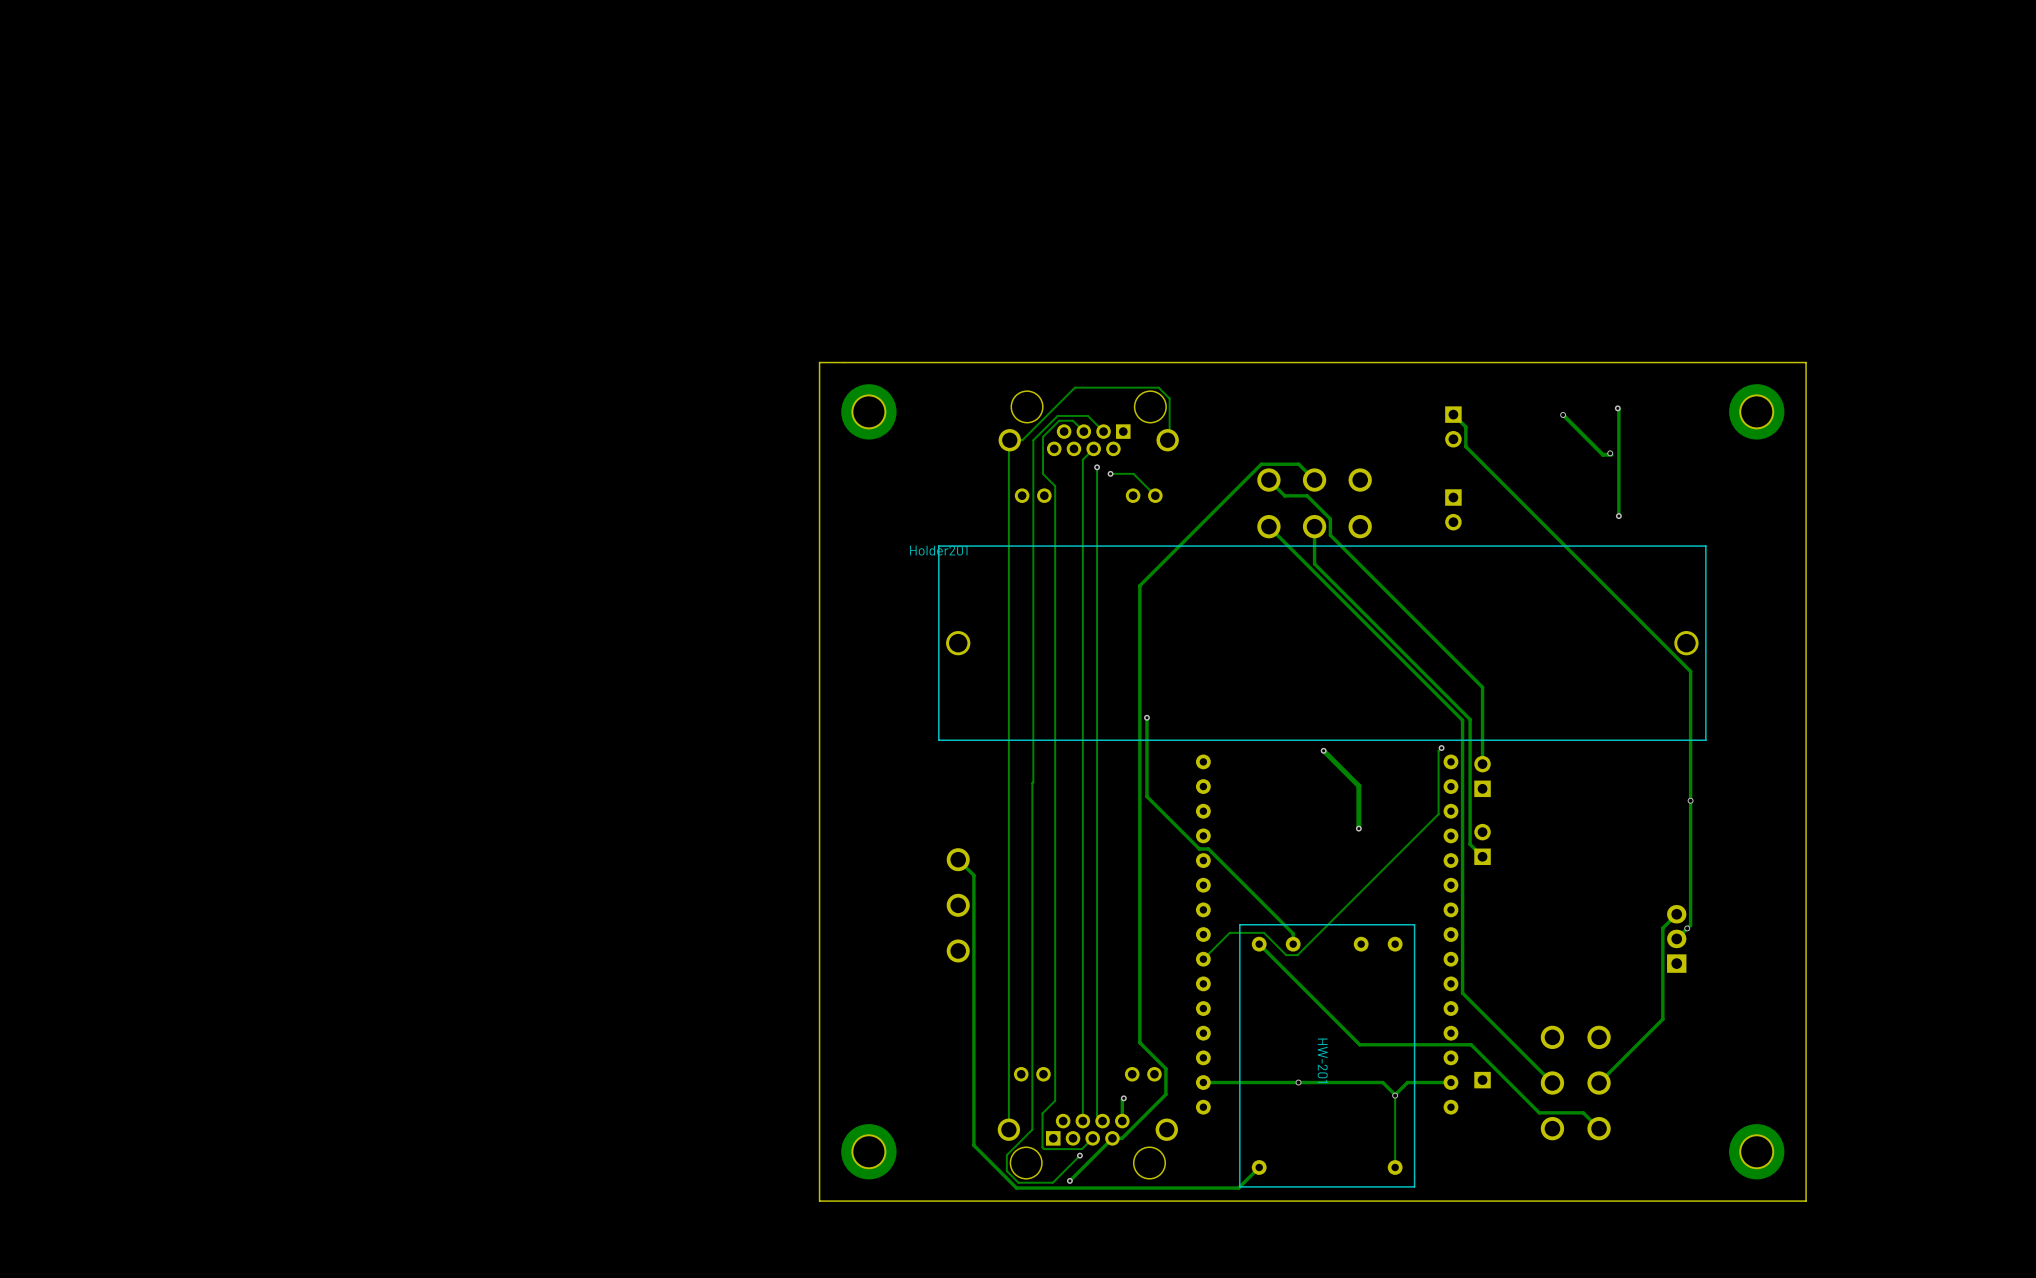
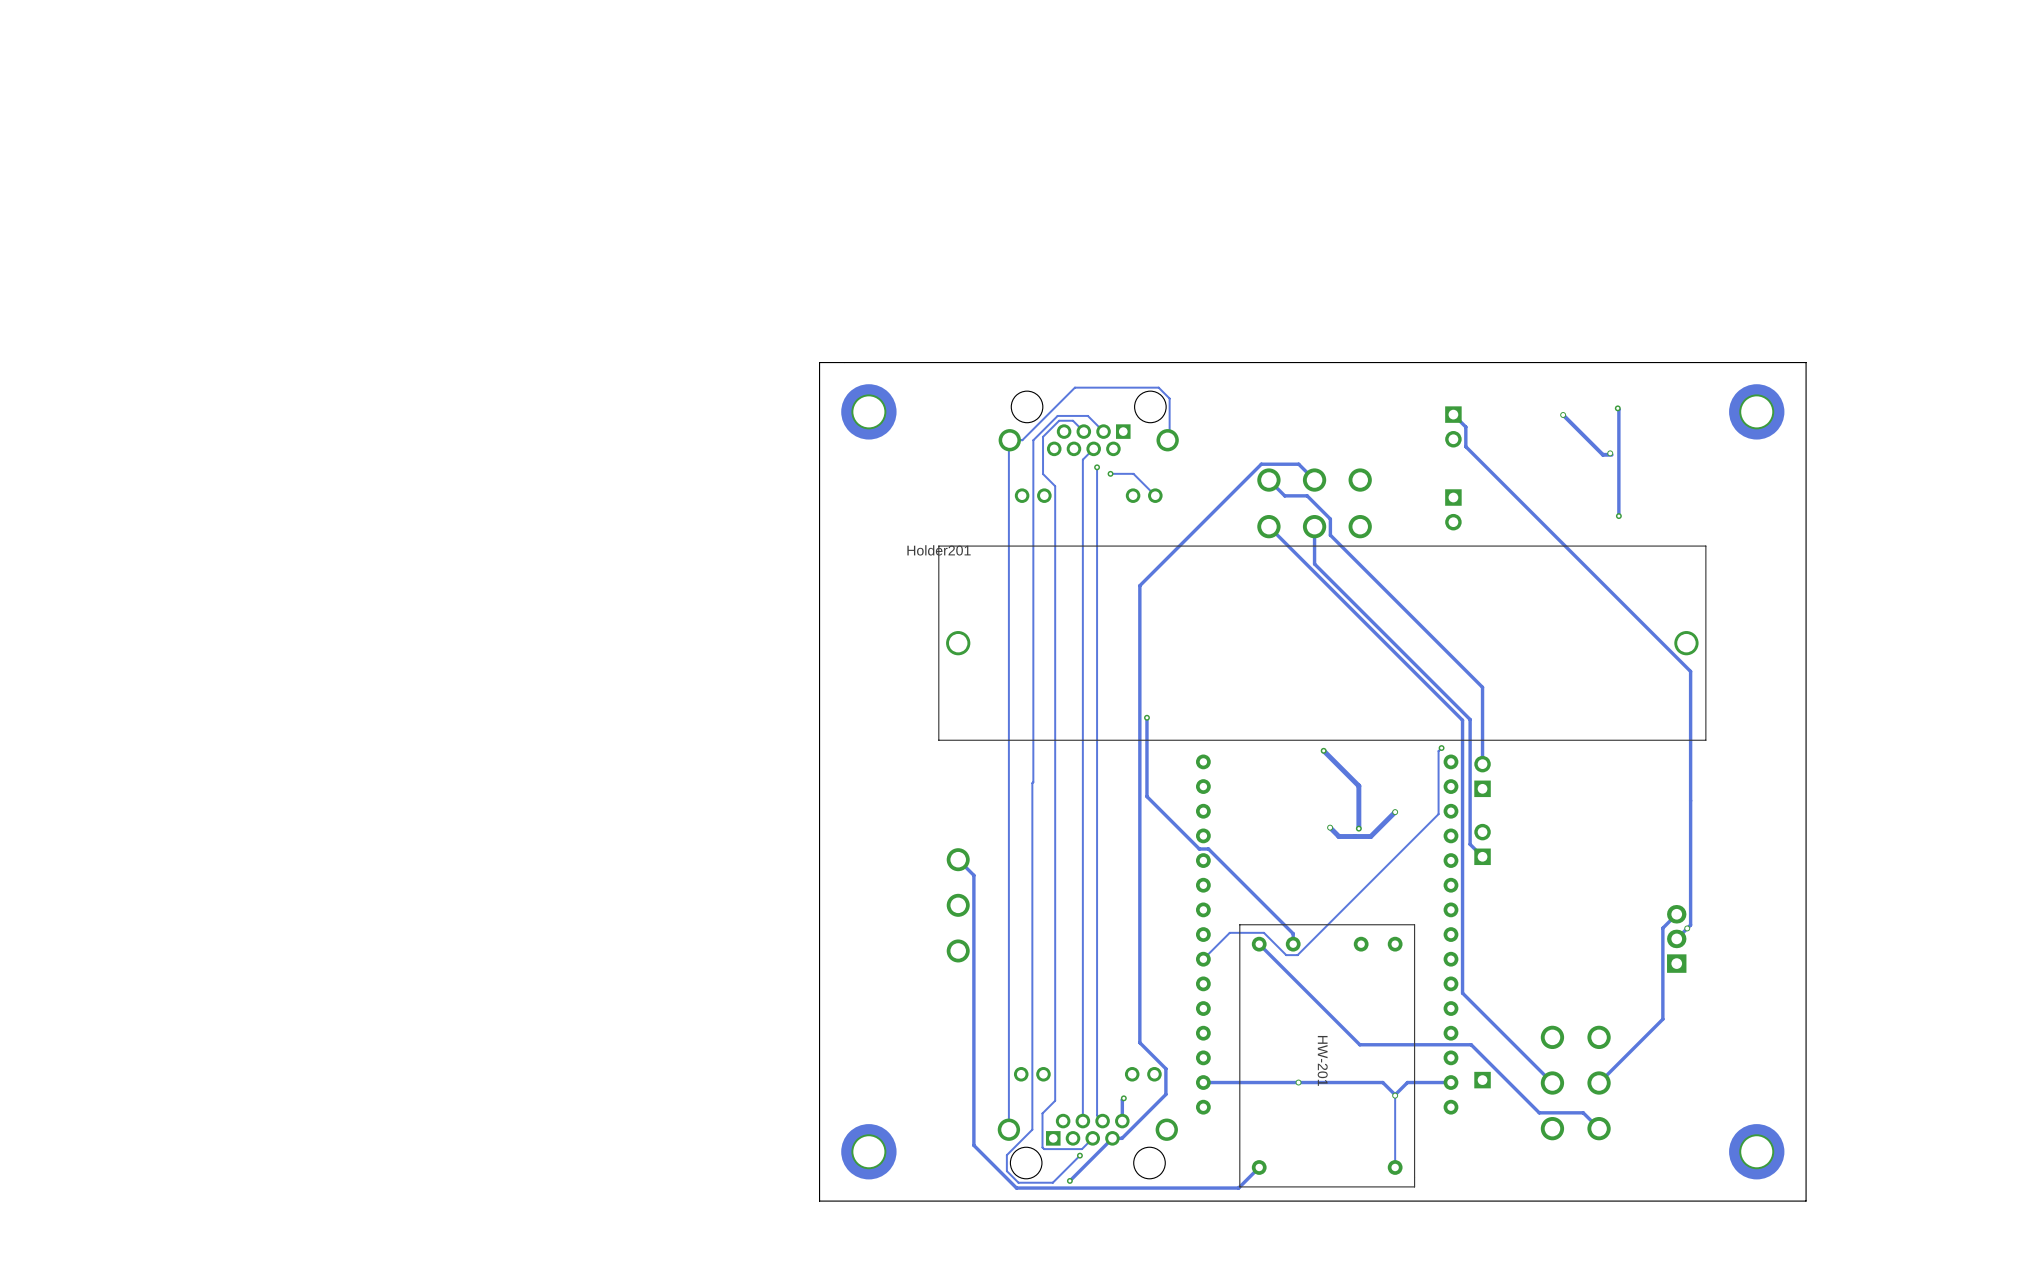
via: (1690, 800) -> none
track: none -> (1395, 812) (1370, 836) (1338, 836) (1330, 827)
via: none -> (1395, 812)
via: none -> (1330, 827)

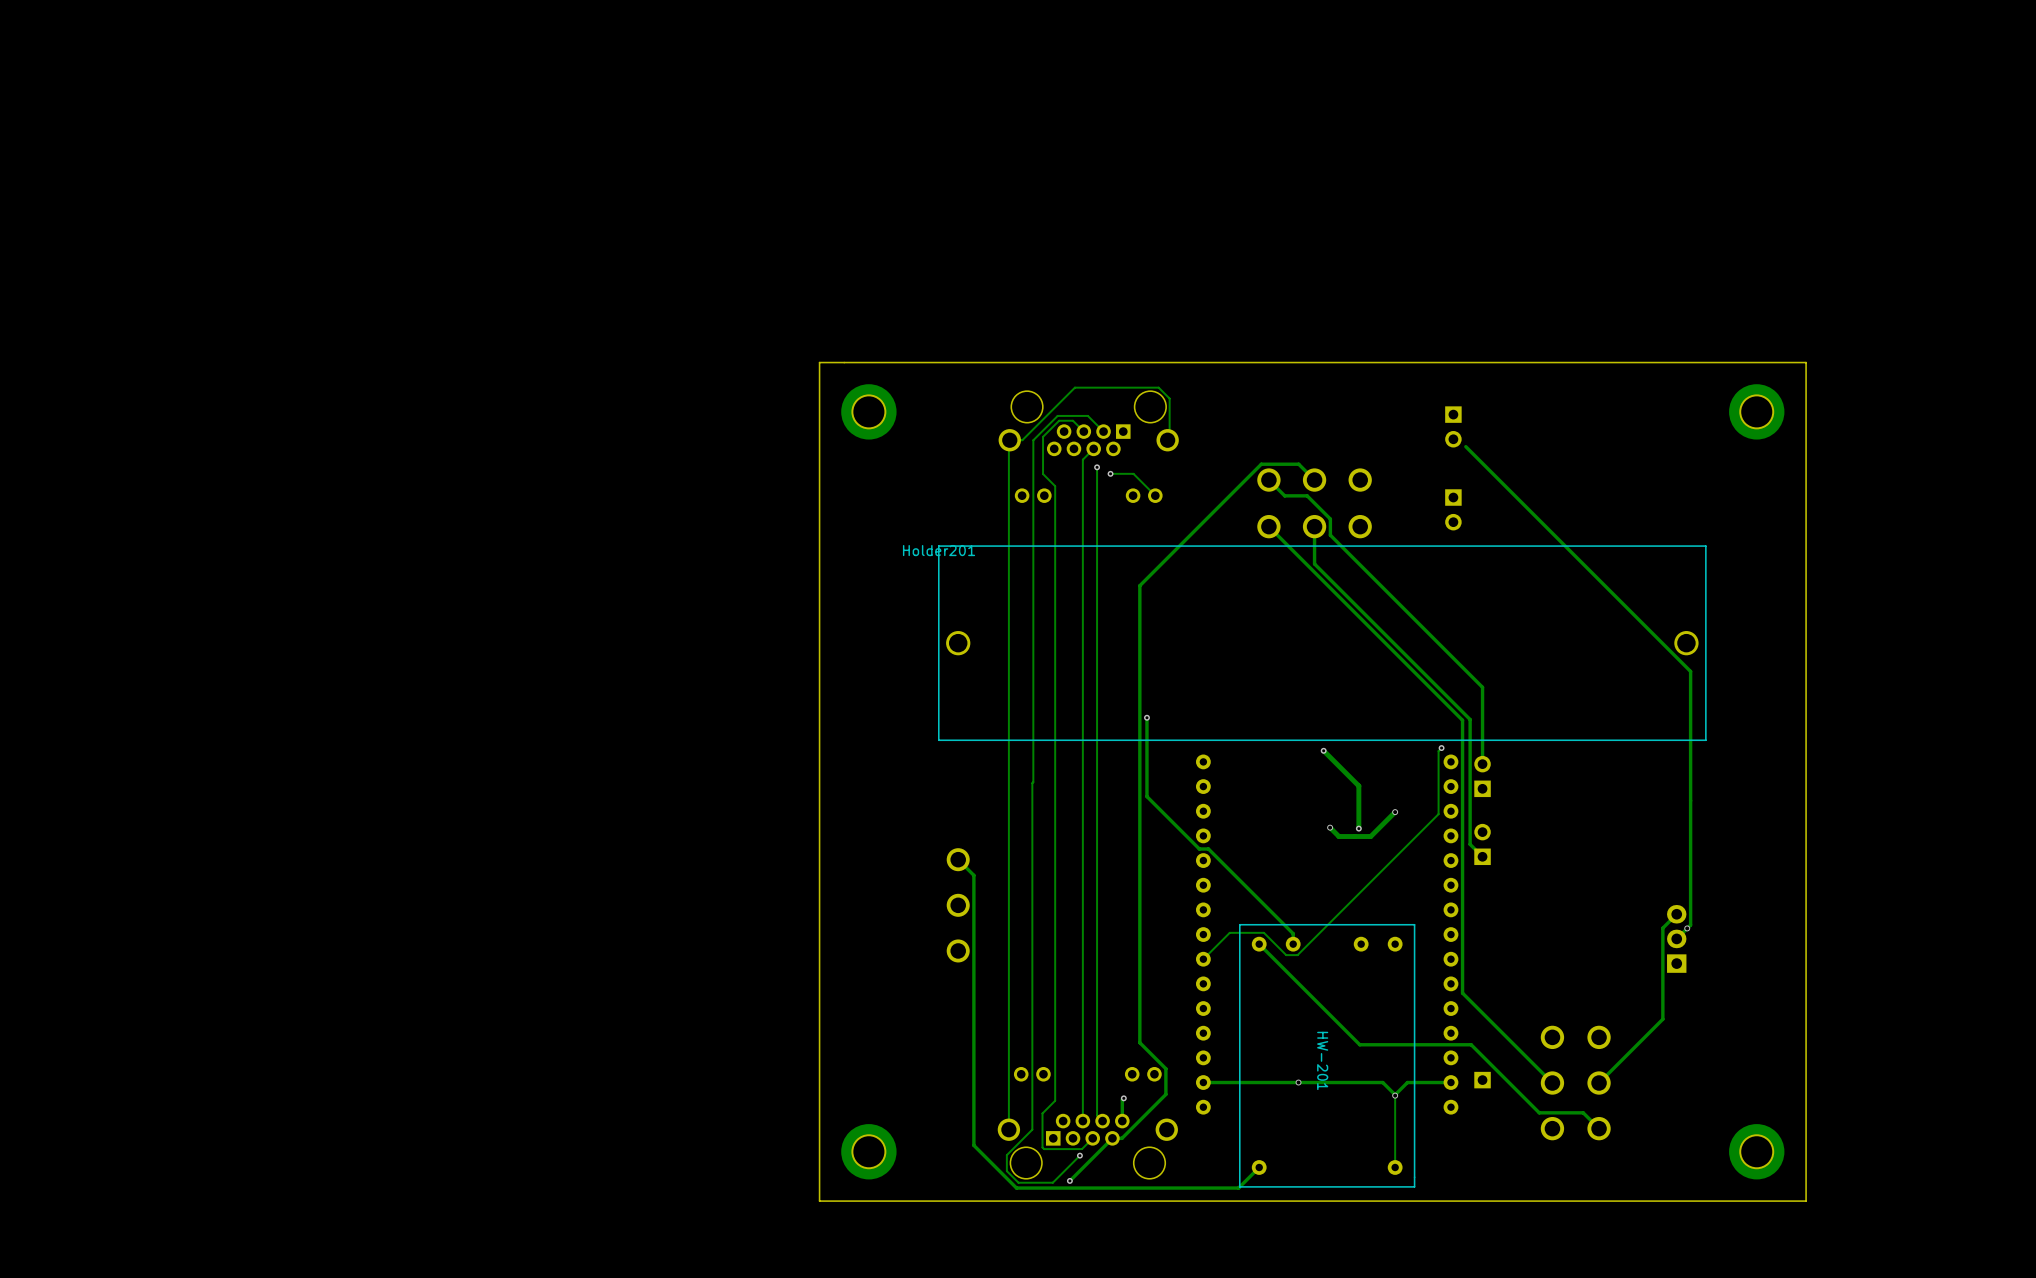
track: (1617, 408) (1618, 516) -> none
via: (1617, 408) -> none
track: (1453, 414) (1465, 427) (1465, 446) -> none
track: (1563, 414) (1602, 454) (1611, 454) -> none
via: (1563, 414) -> none
via: (1610, 453) -> none
via: (1618, 516) -> none

